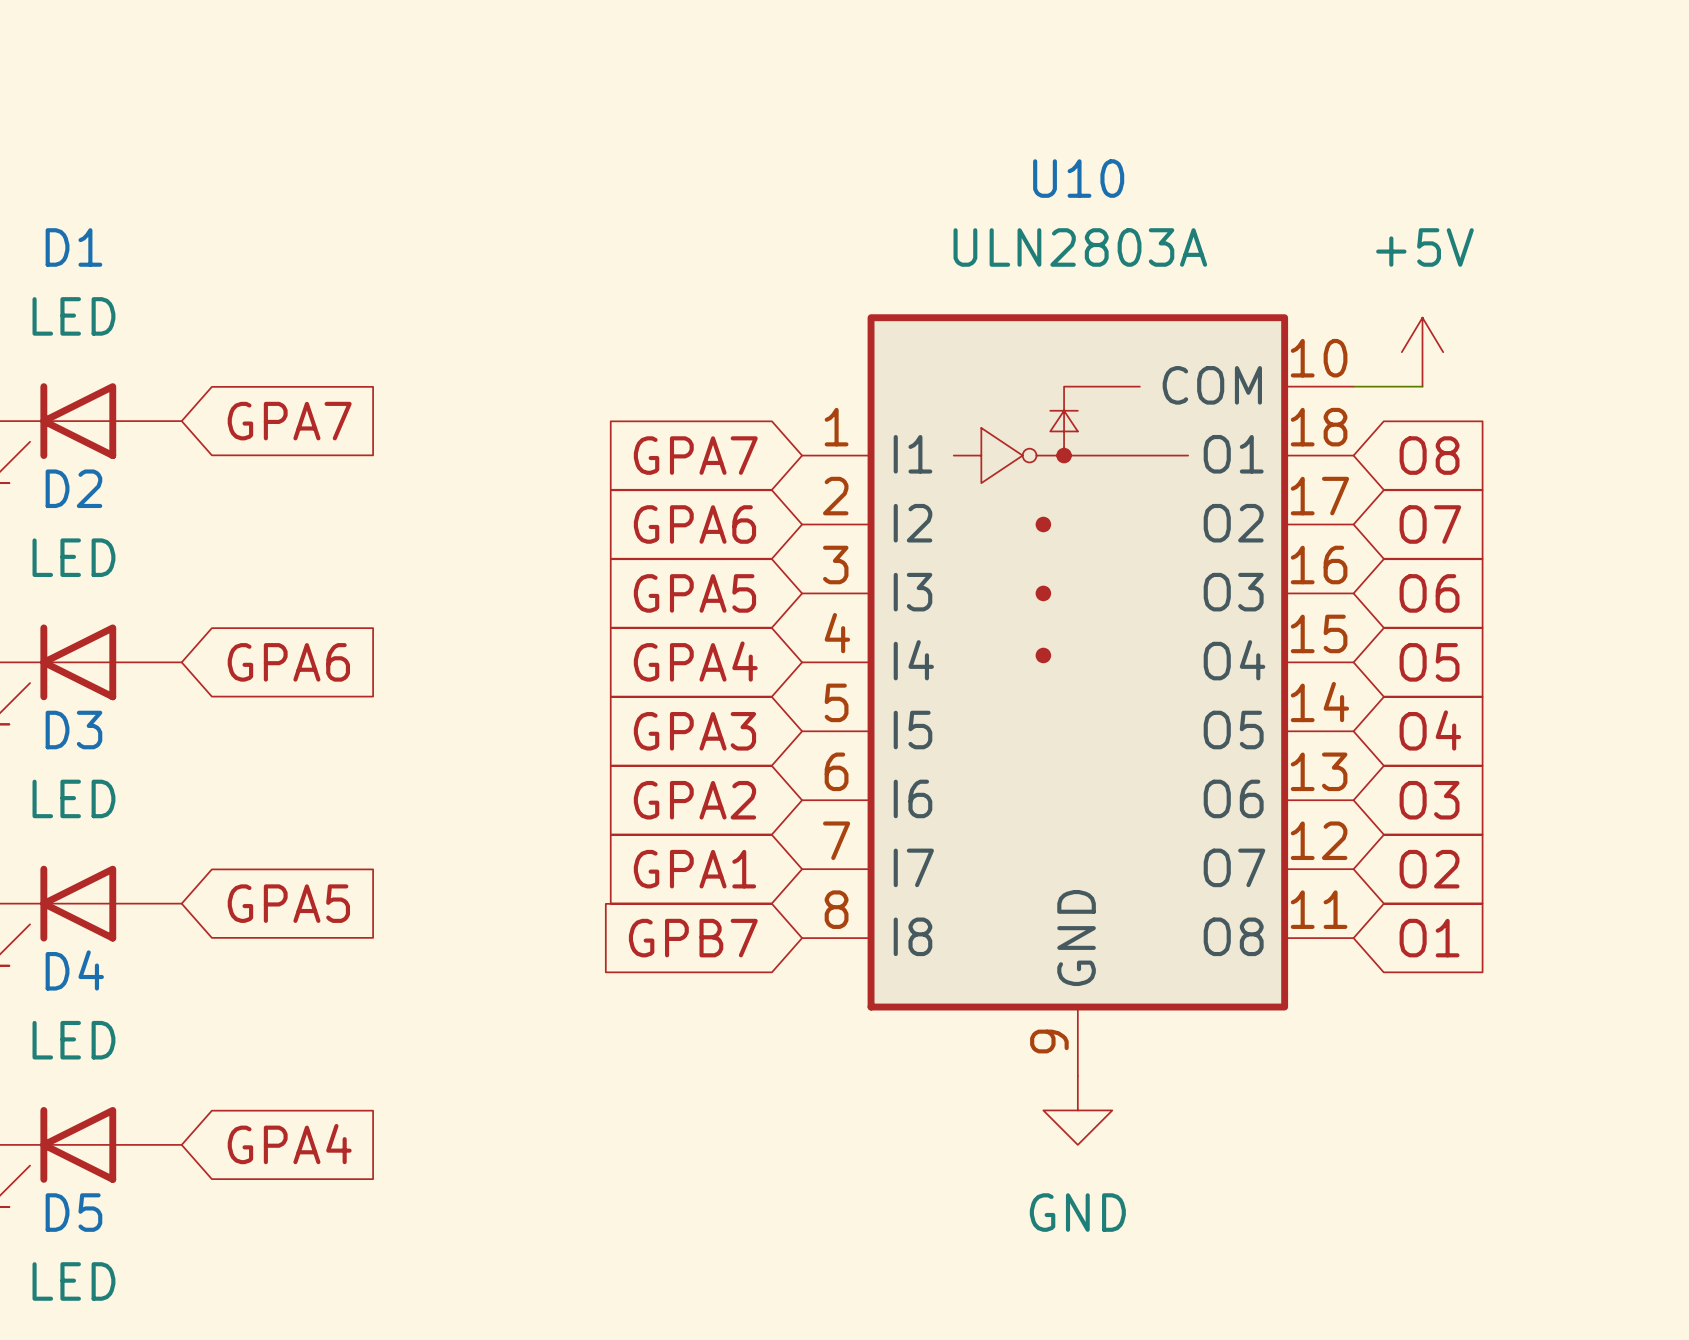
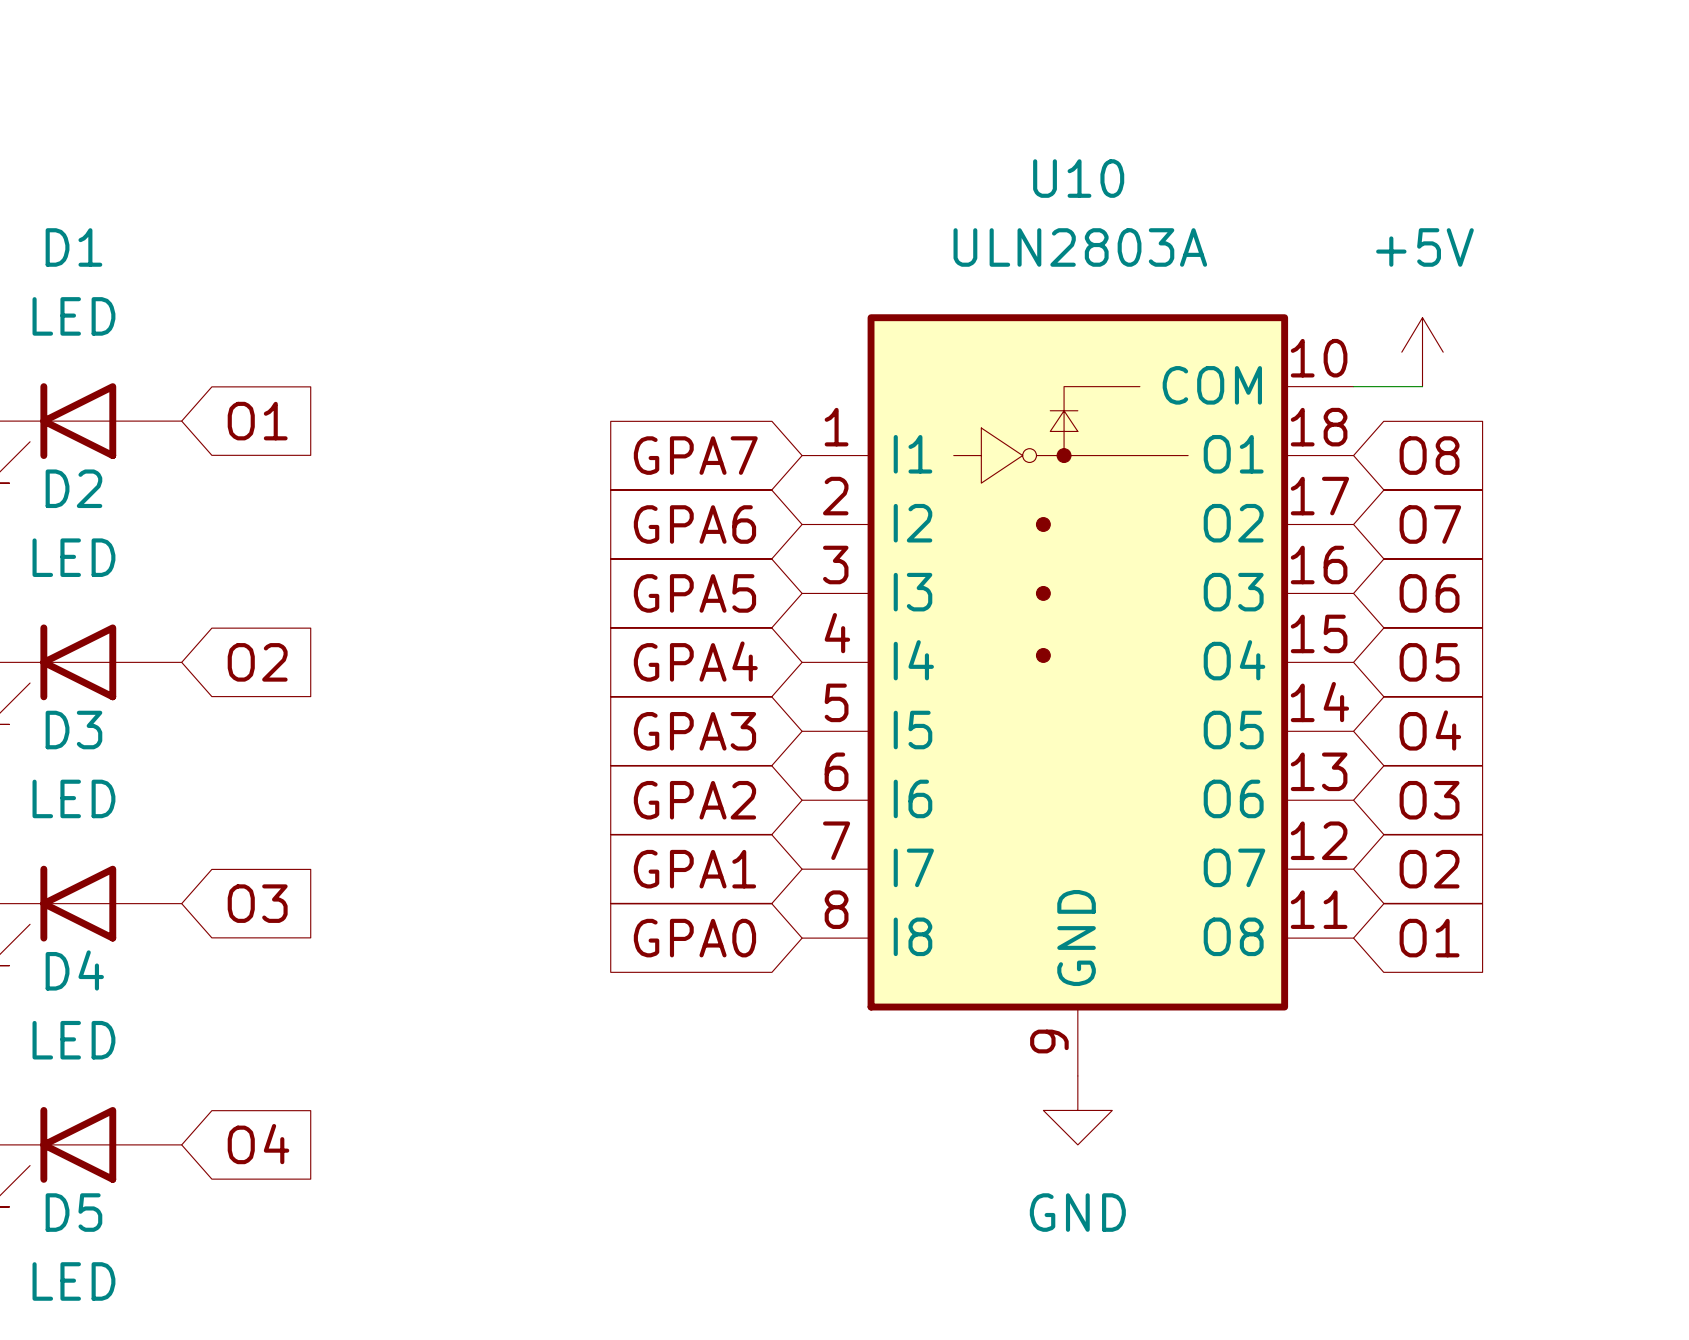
global label: GPA7 (289, 421) -> O1 (257, 421)
global label: GPA6 (288, 662) -> O2 (257, 662)
global label: GPA5 (288, 903) -> O3 (257, 903)
global label: GPB7 (693, 938) -> GPA0 (694, 938)
global label: GPA4 (289, 1144) -> O4 (258, 1144)

